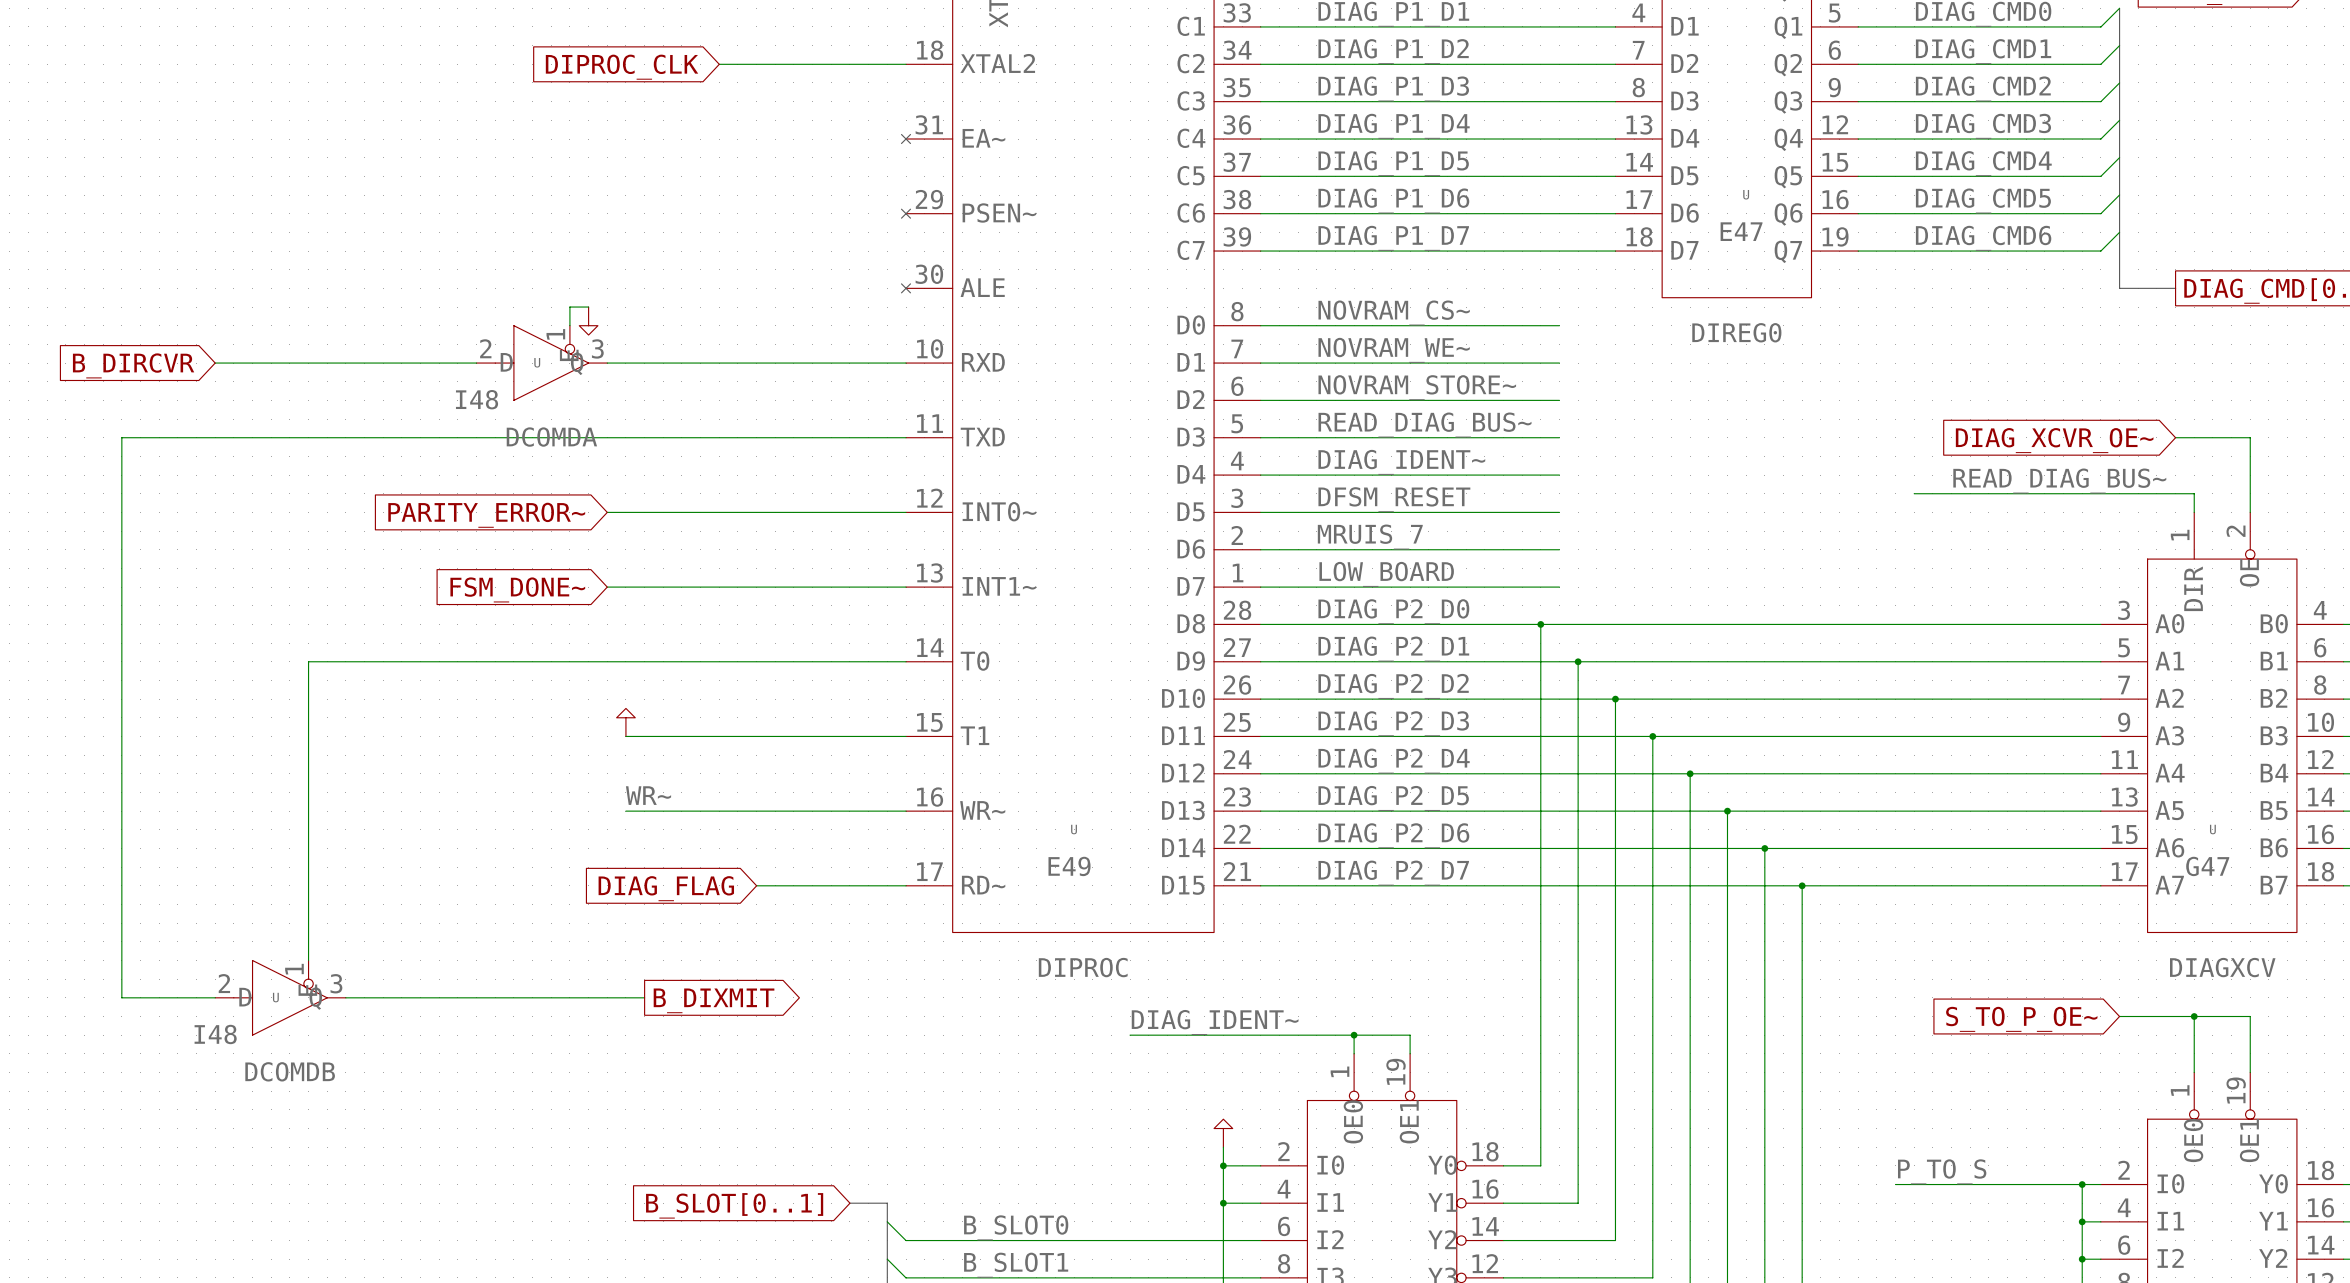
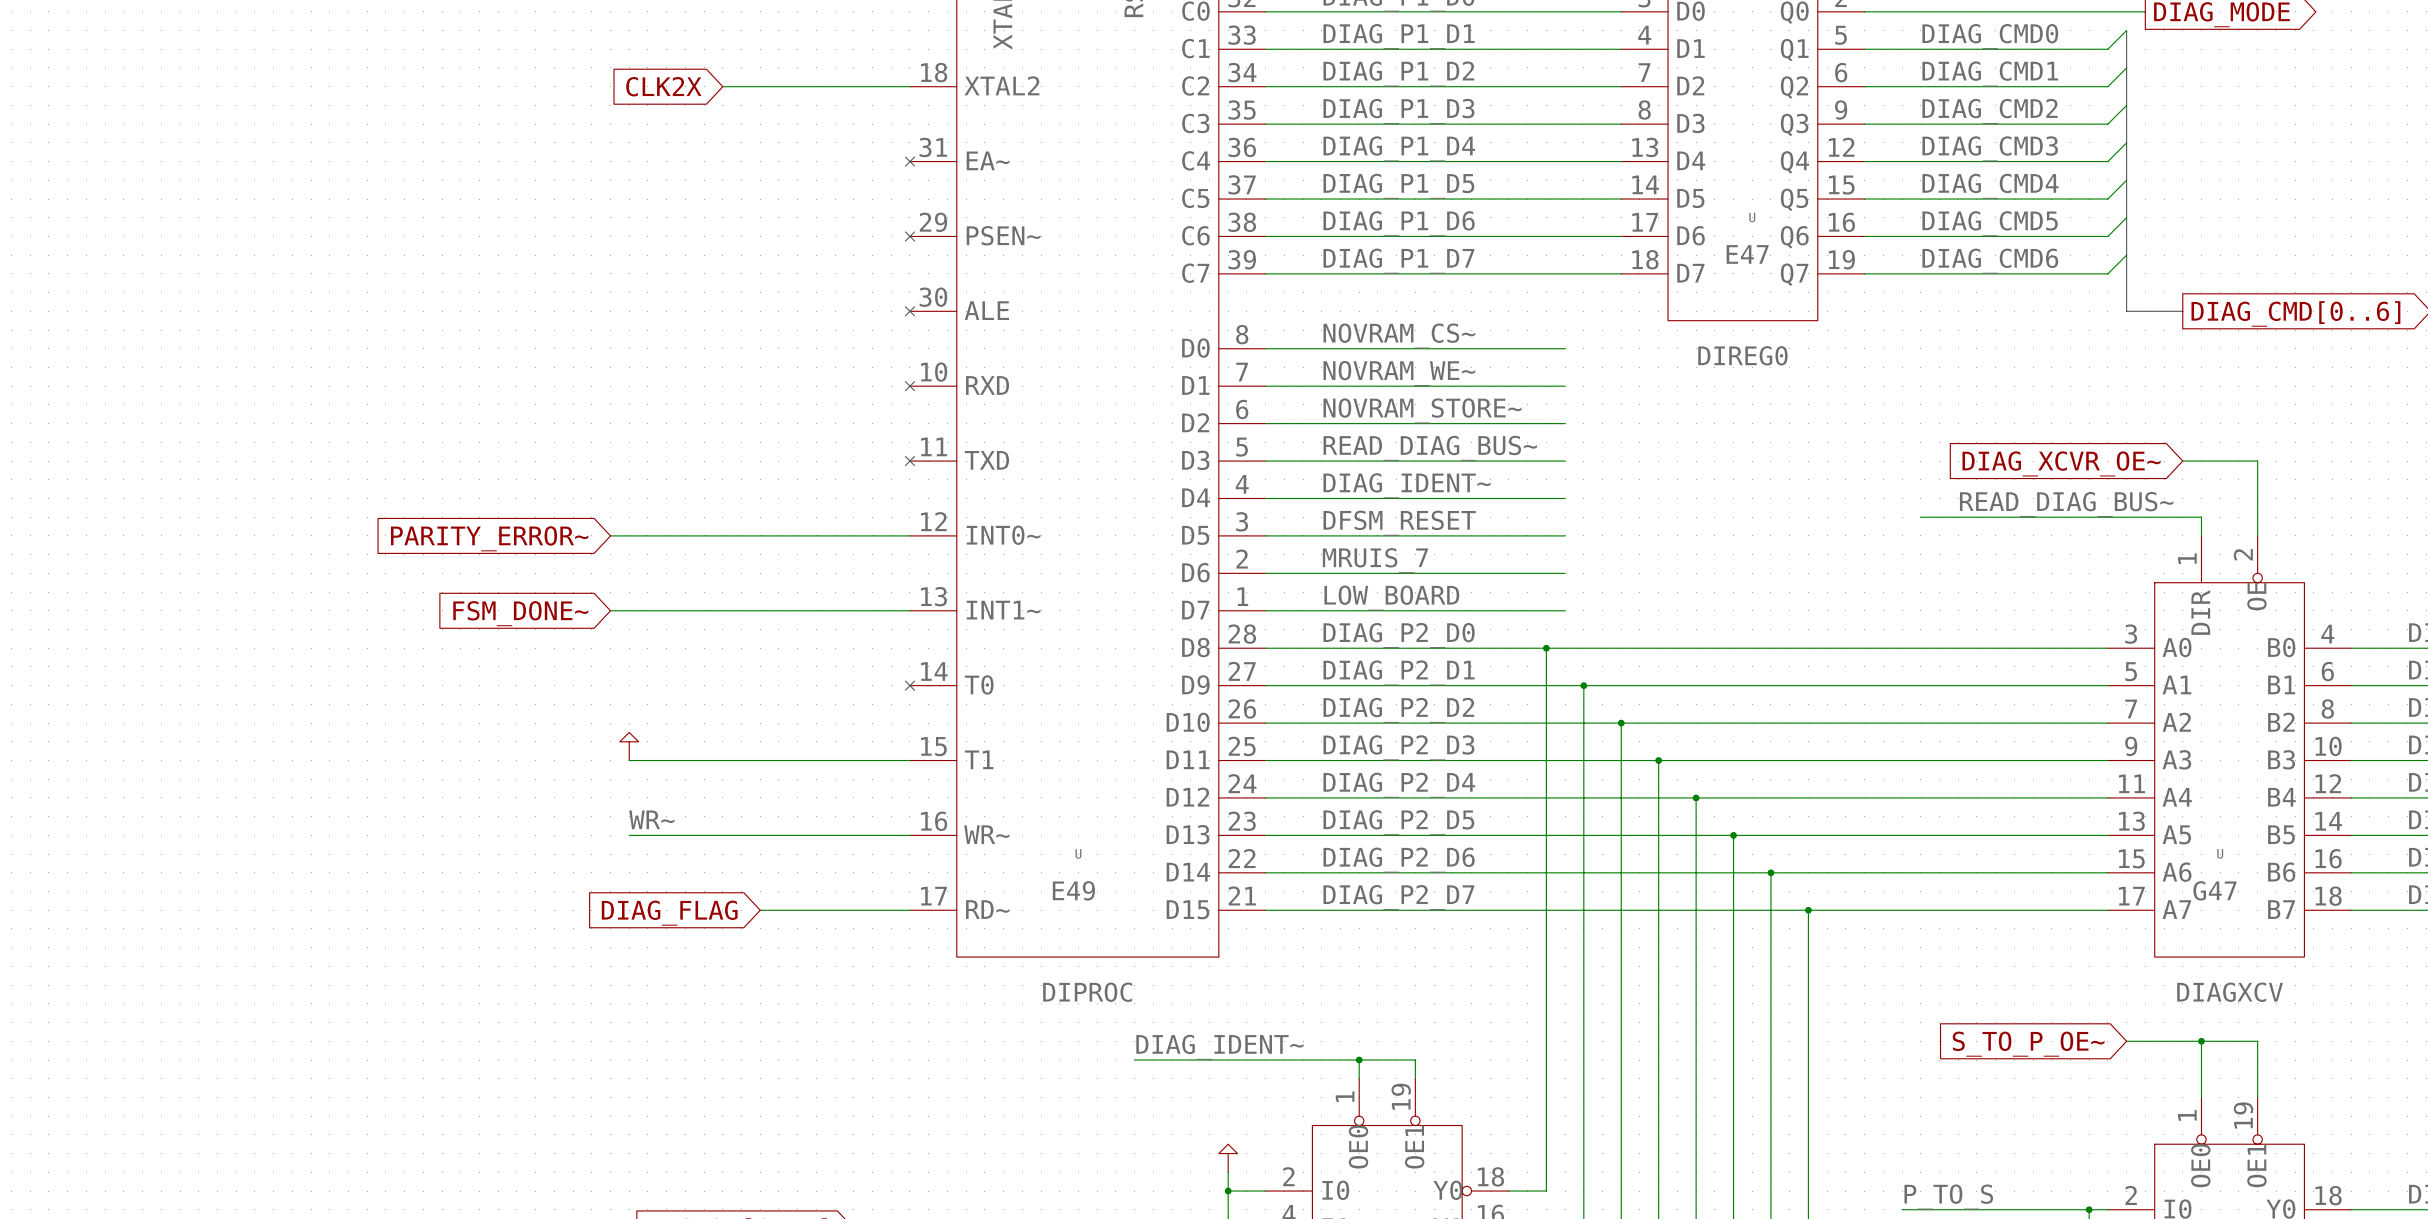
global label: DIPROC_CLK (622, 67) -> CLK2X (663, 86)
wire: (588, 307) (569, 307) (569, 325) -> none
power symbol: (588, 321) -> none
wire: (215, 363) (476, 363) -> none
U: (541, 363) -> none
wire: (607, 363) (906, 363) -> none
no-connect mark: none -> (909, 386)
global label: B_DIRCVR (133, 365) -> none
wire: (906, 437) (121, 437) (121, 997) (215, 997) -> none
no-connect mark: none -> (909, 461)
wire: (906, 661) (308, 661) (308, 960) -> none
no-connect mark: none -> (909, 685)
U: (280, 997) -> none
wire: (345, 997) (644, 997) -> none
global label: B_DIXMIT (714, 1000) -> none

